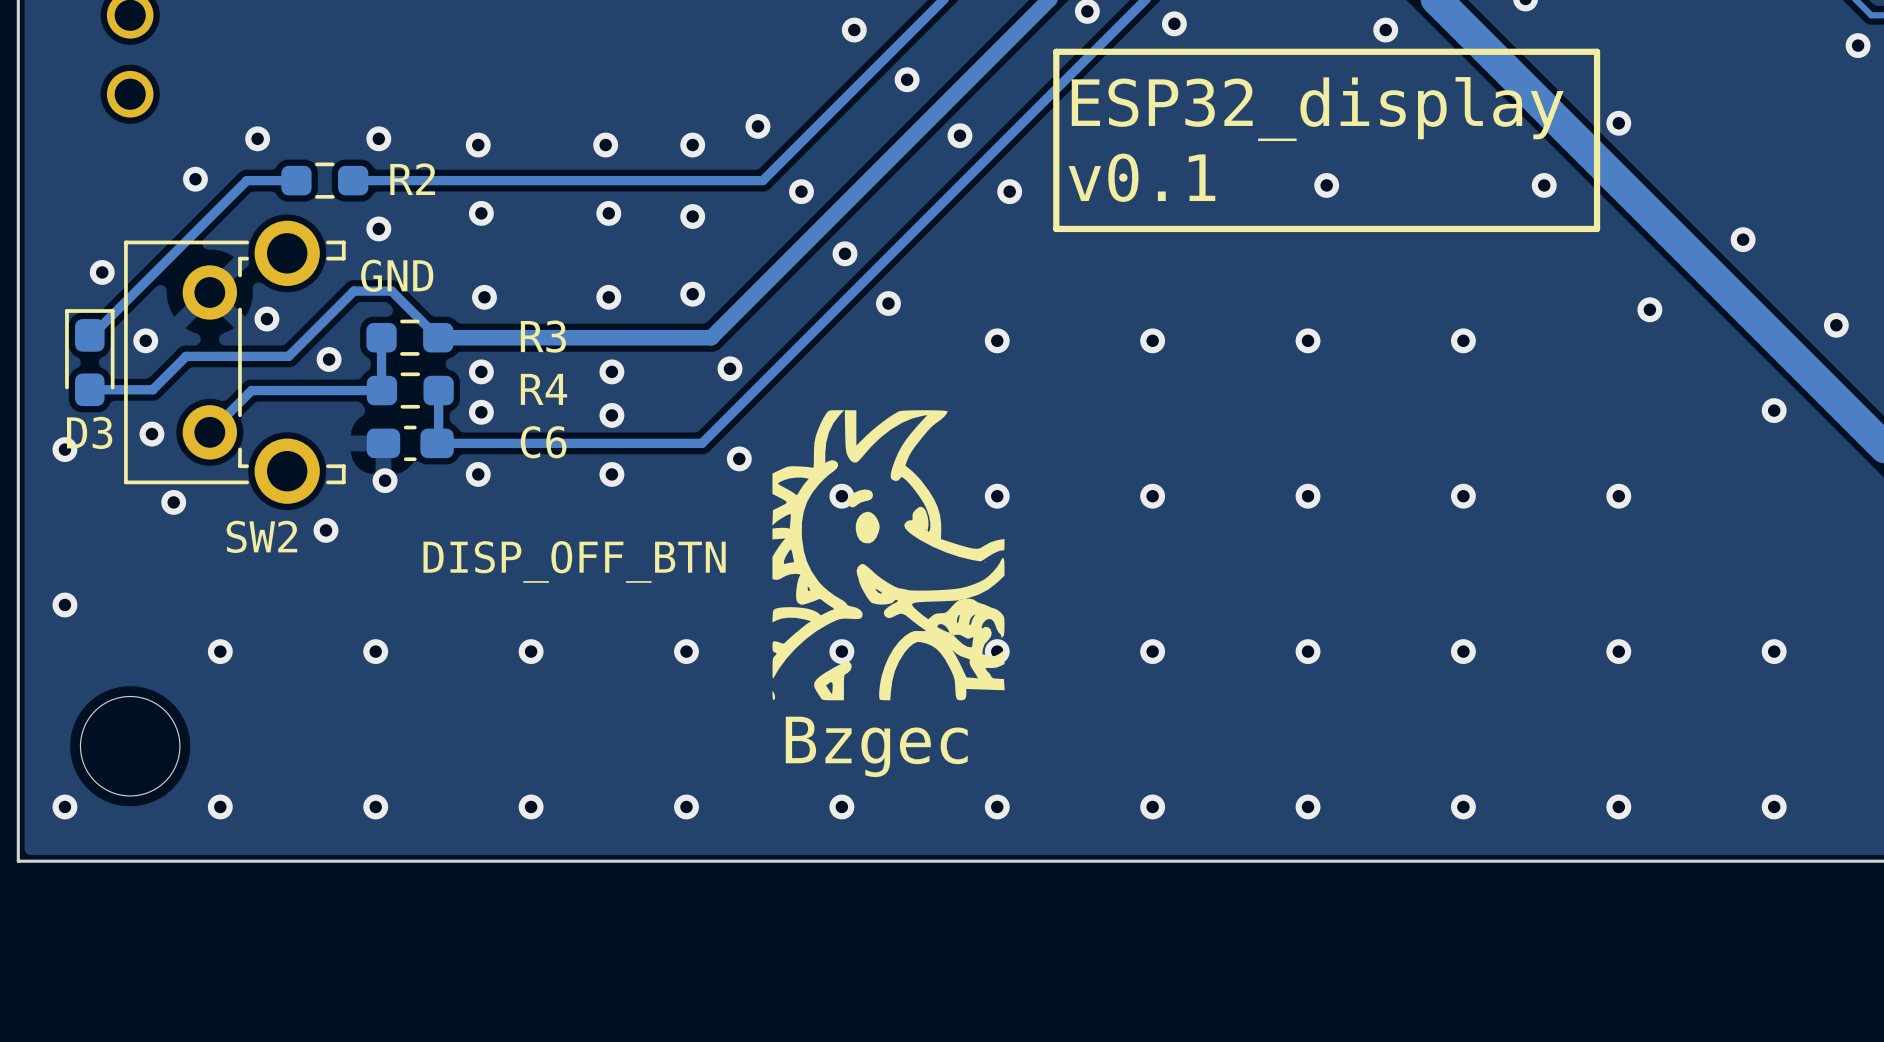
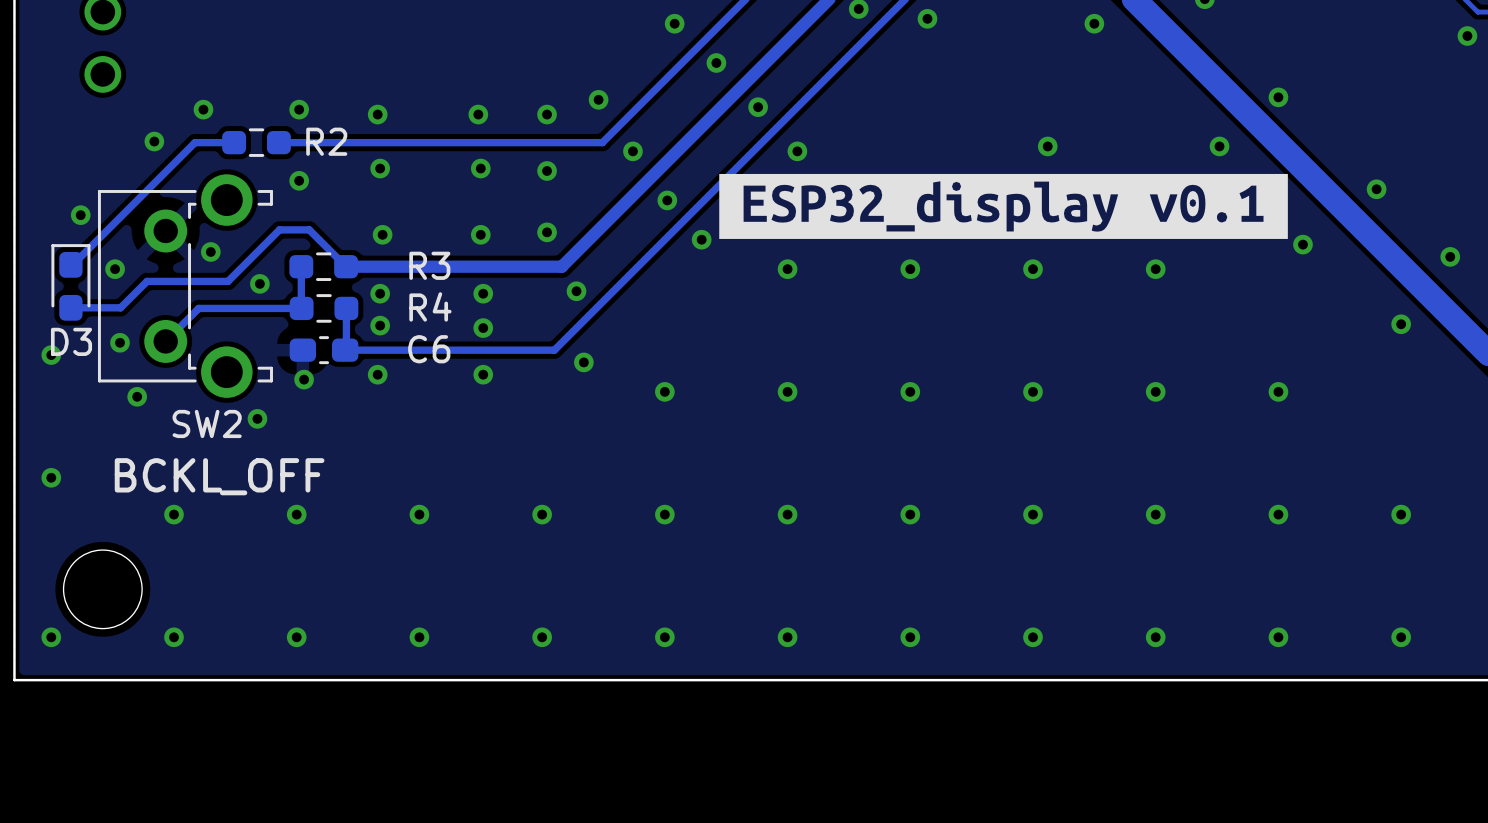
line: (1597, 51) (1056, 51) (1056, 228) (1597, 228) (1597, 51) -> none
text: ESP32_display (1317, 109) -> none
text: v0.1 (1142, 177) -> none
drawing: none -> [719, 173, 1288, 239]
text: GND (397, 275) -> none
drawing: [772, 410, 1005, 701] -> none
text: DISP_OFF_BTN (574, 561) -> none
text: none -> BCKL_OFF (219, 476)
text: Bzgec (876, 746) -> none

